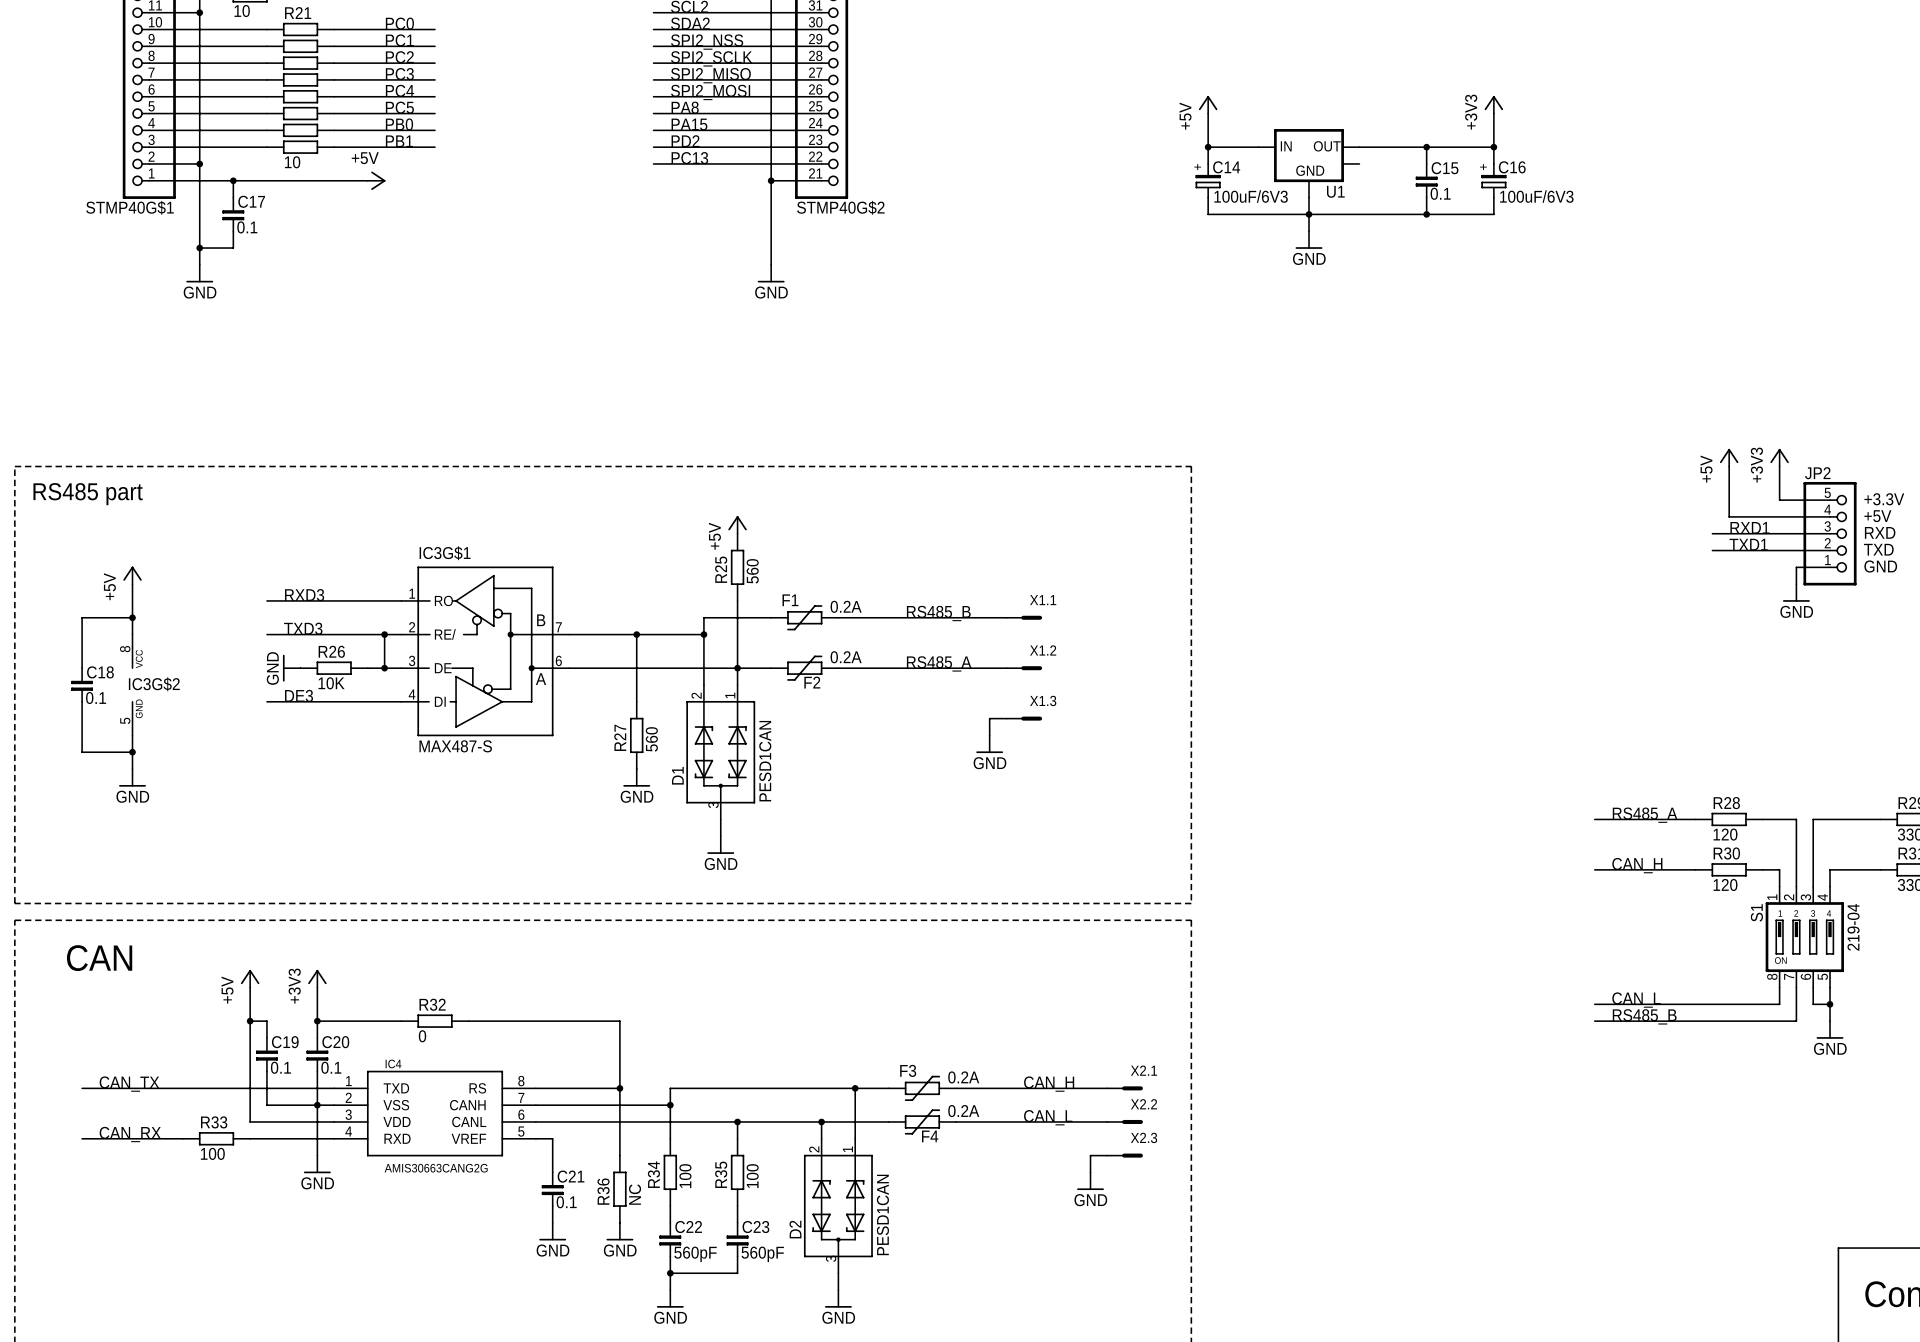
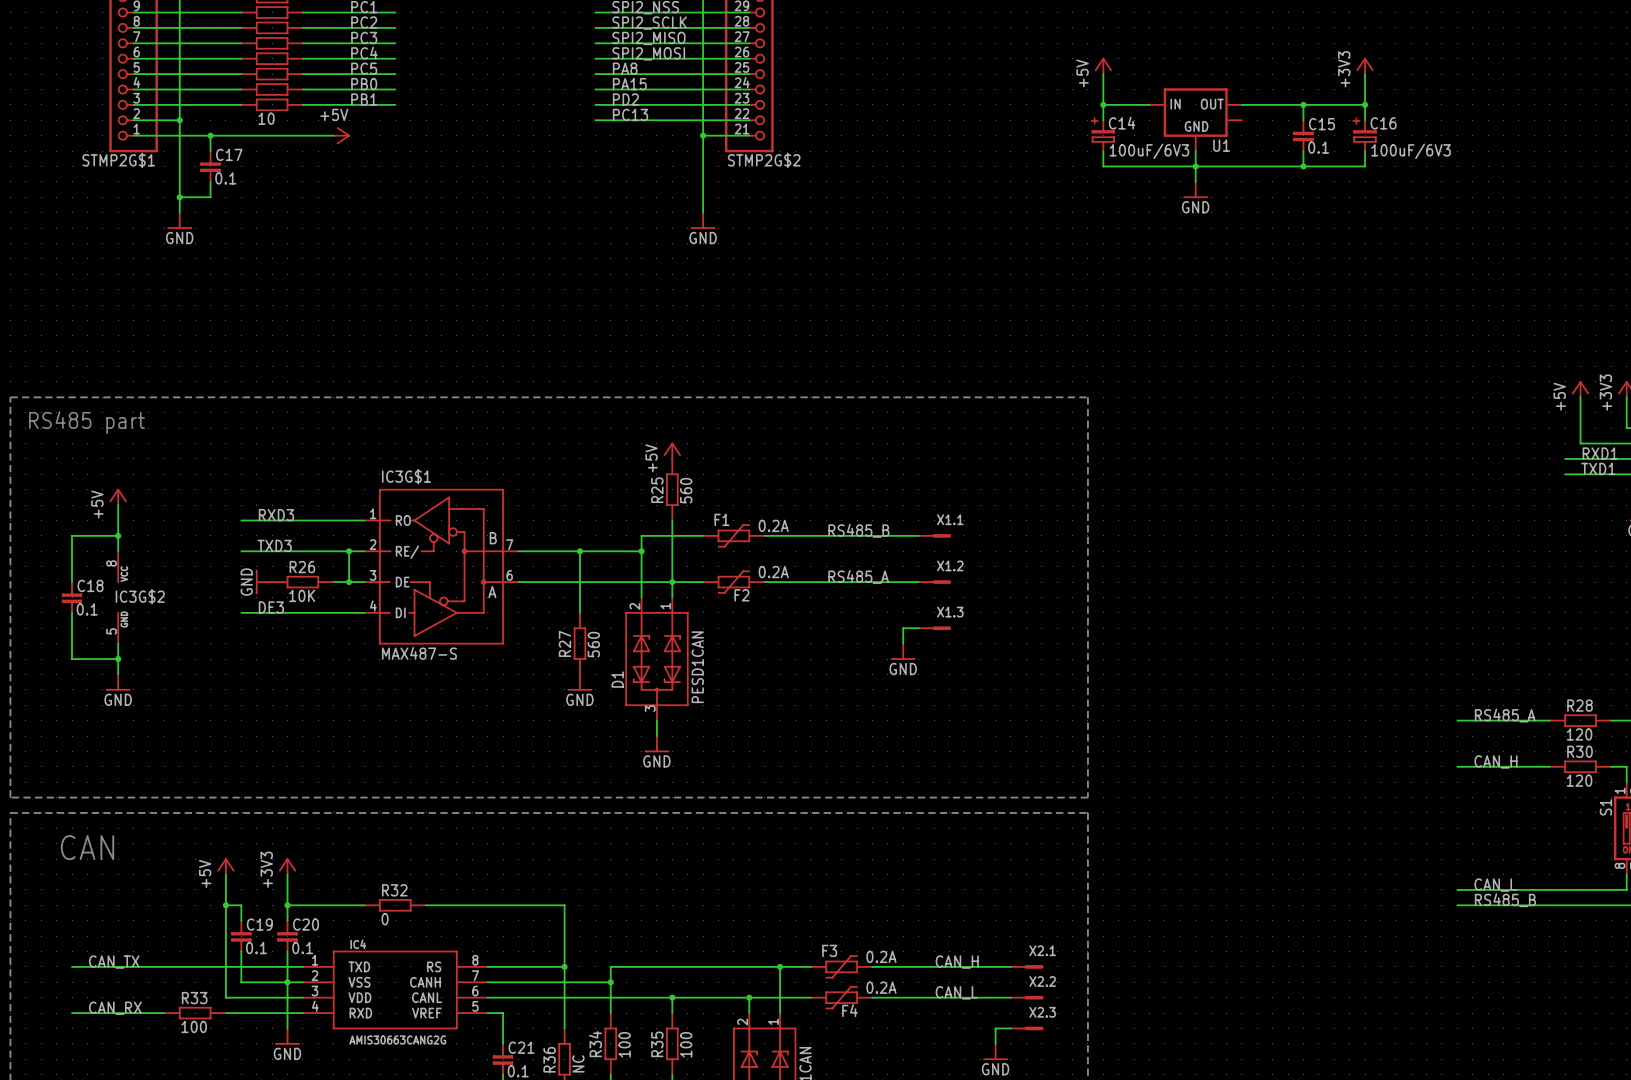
STMP40G$1 name: STMP40G$1 (130, 207) -> STMP2G$1 (118, 160)
STMP40G$2 name: STMP40G$2 (840, 207) -> STMP2G$2 (764, 160)

